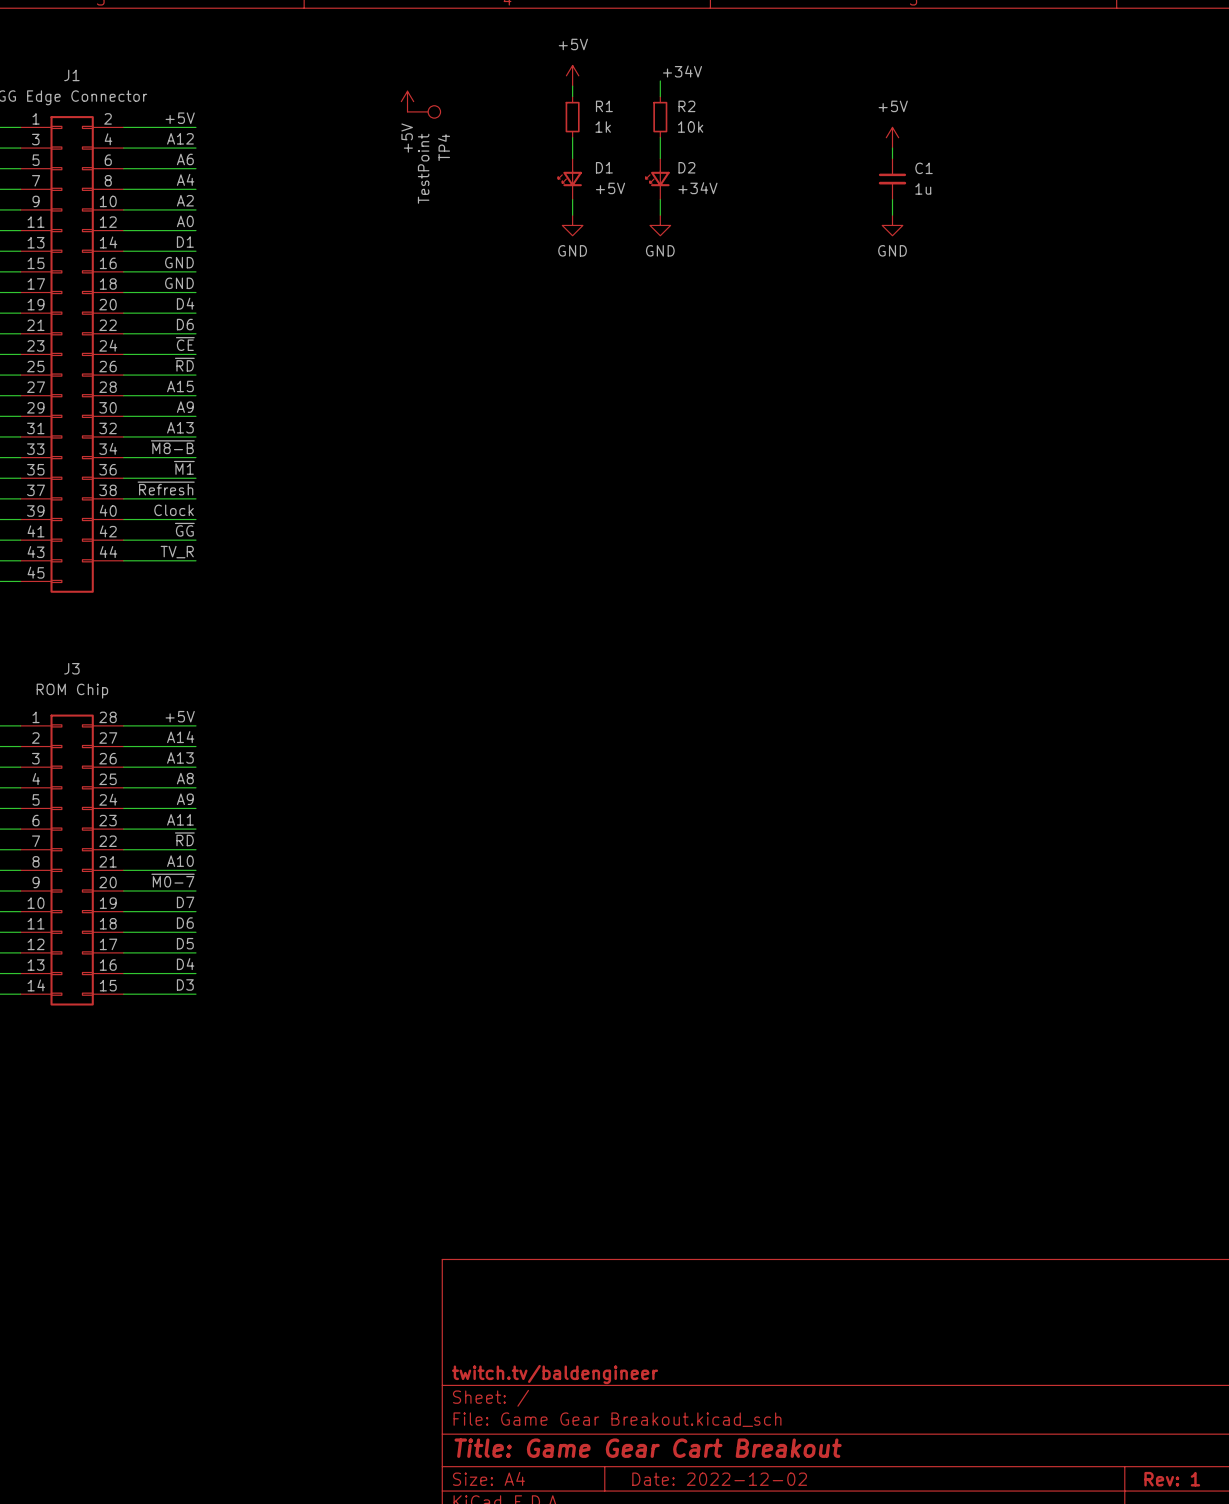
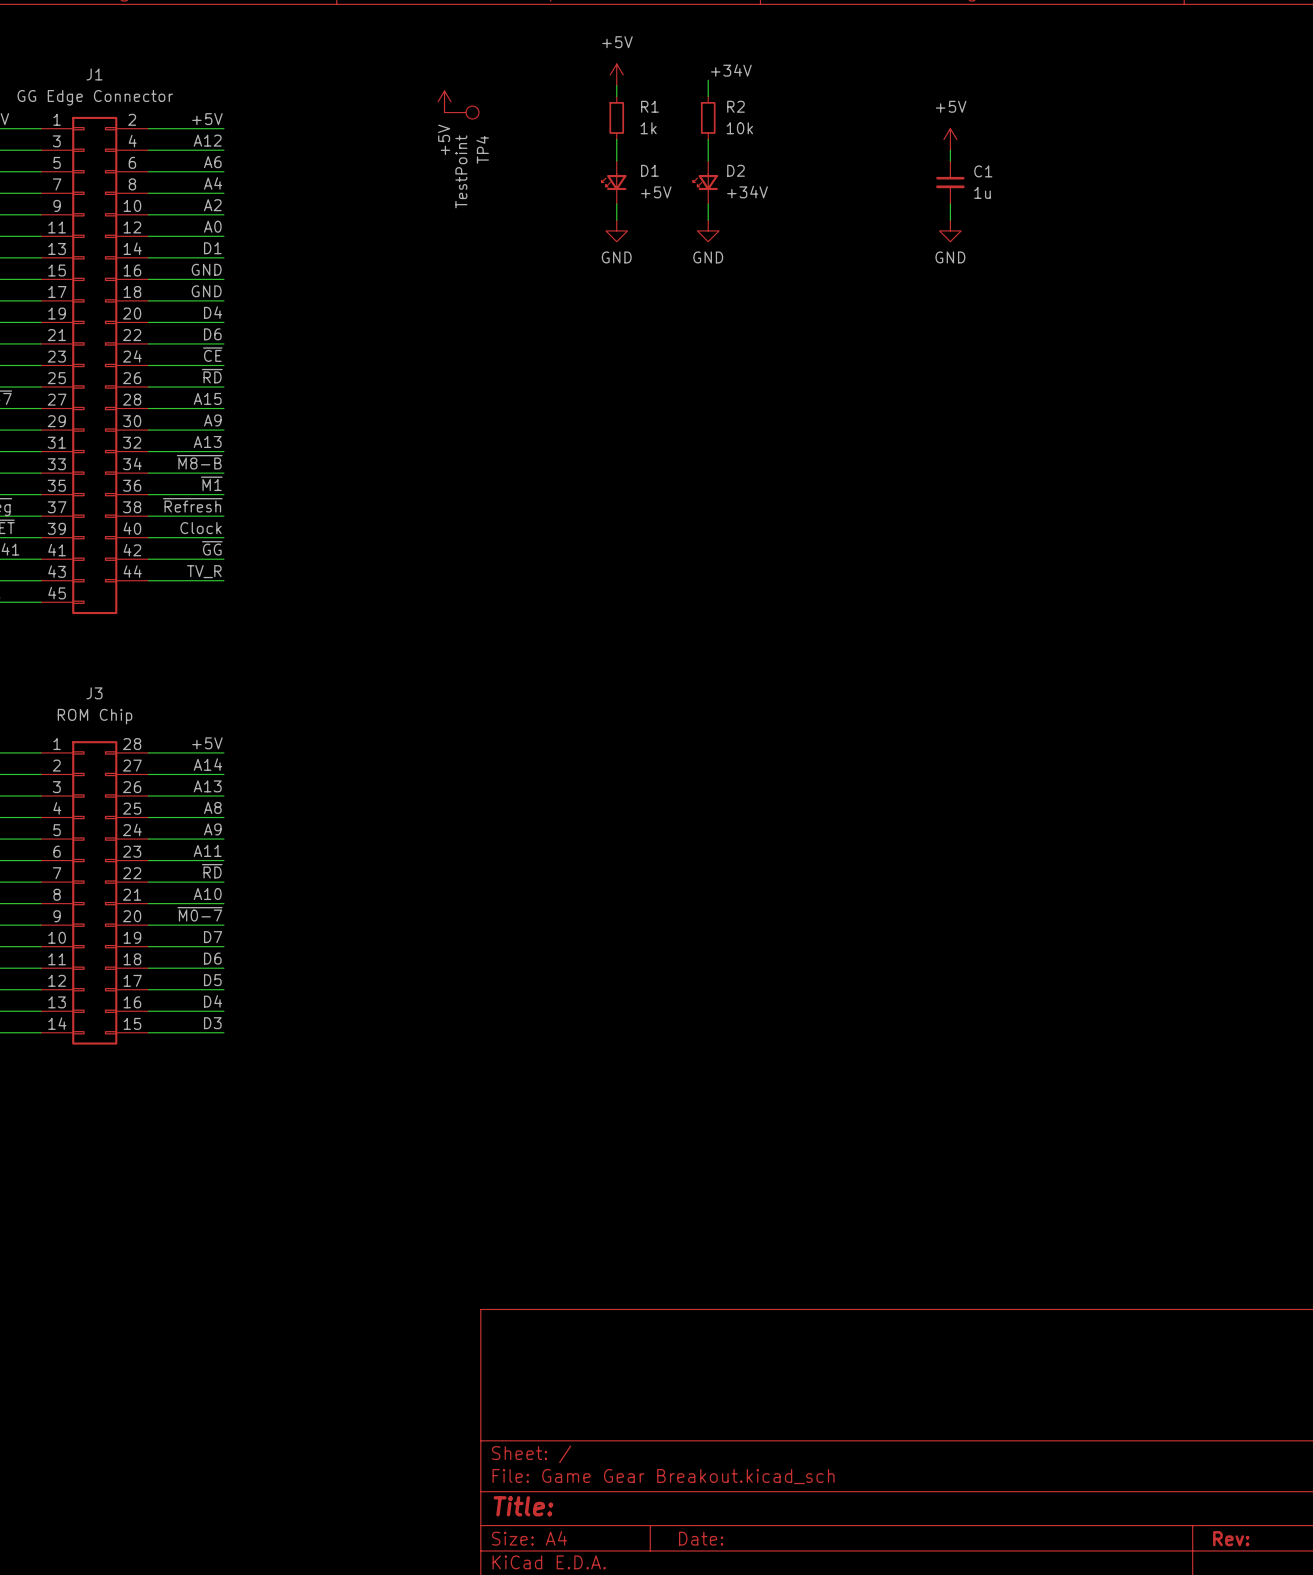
title block: twitch.tv/baldengineer (555, 1374) -> none
title block: Title: Game Gear Cart Breakout (648, 1448) -> Title: (523, 1506)
title block: Date: 2022-12-02 (719, 1479) -> Date: (701, 1538)
title block: Rev: 1 (1172, 1479) -> Rev: (1231, 1538)

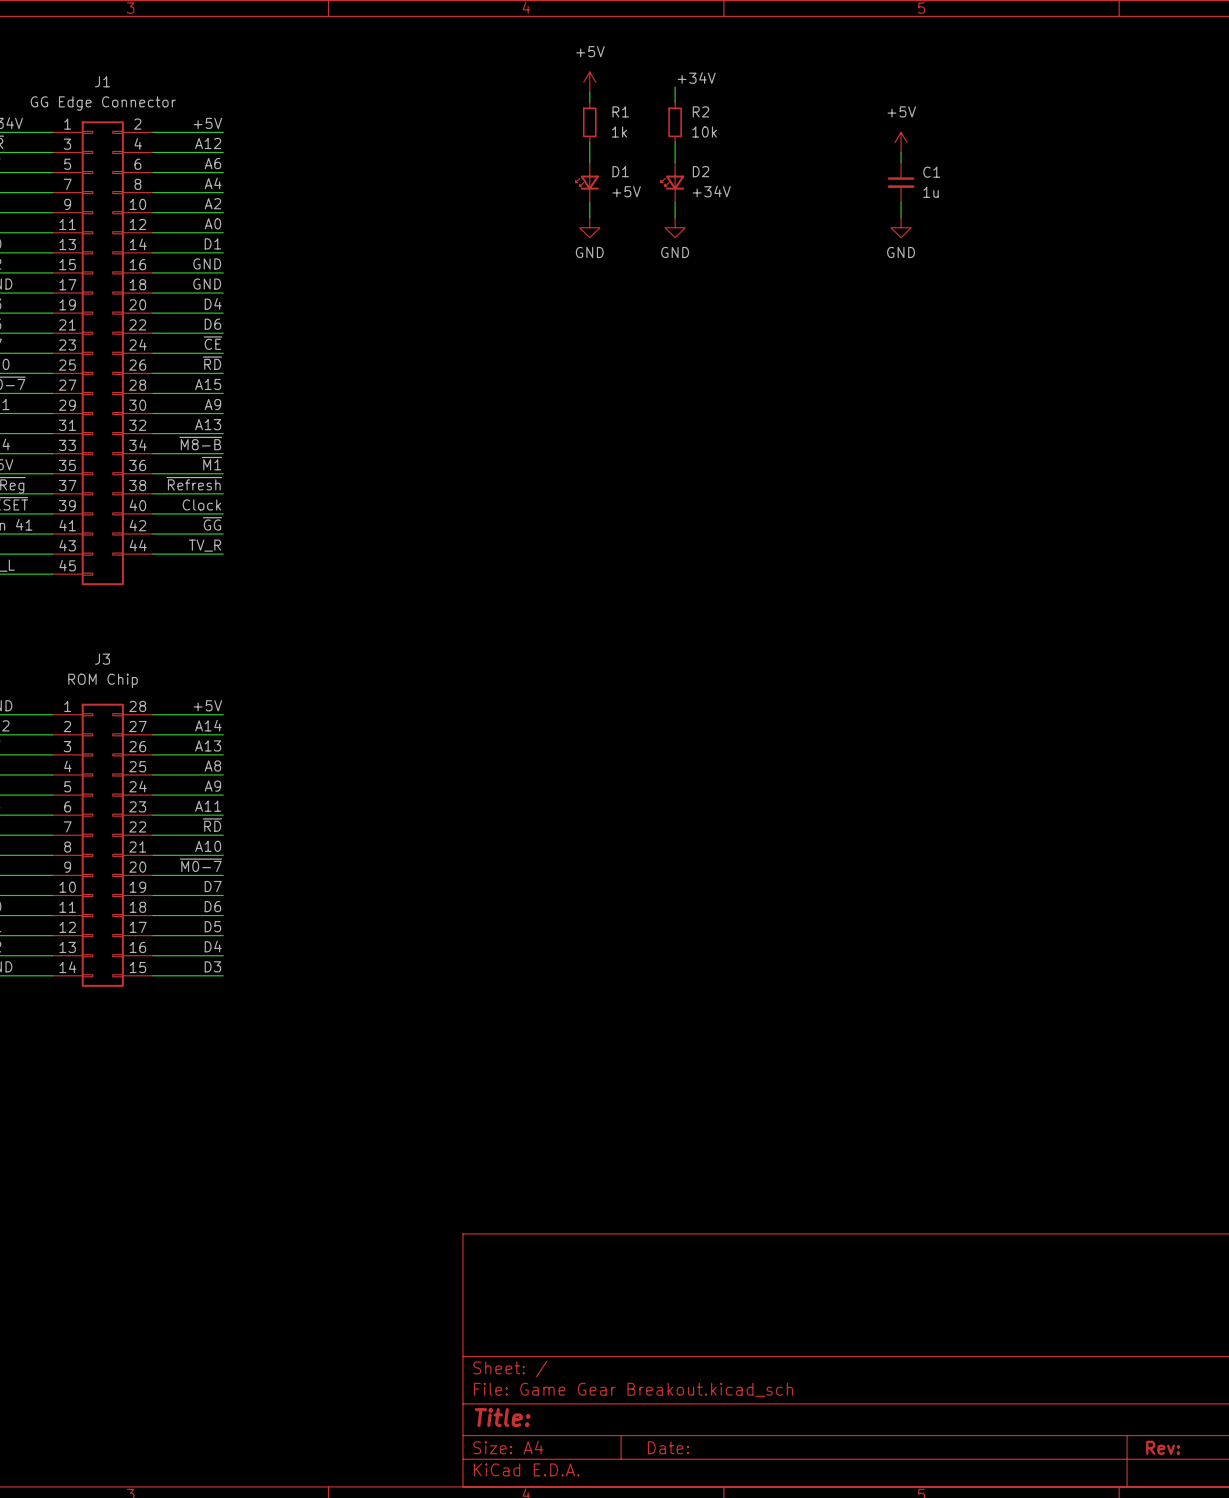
power symbol: +5V (444, 101) -> none
TP4: TestPoint (461, 112) -> none

